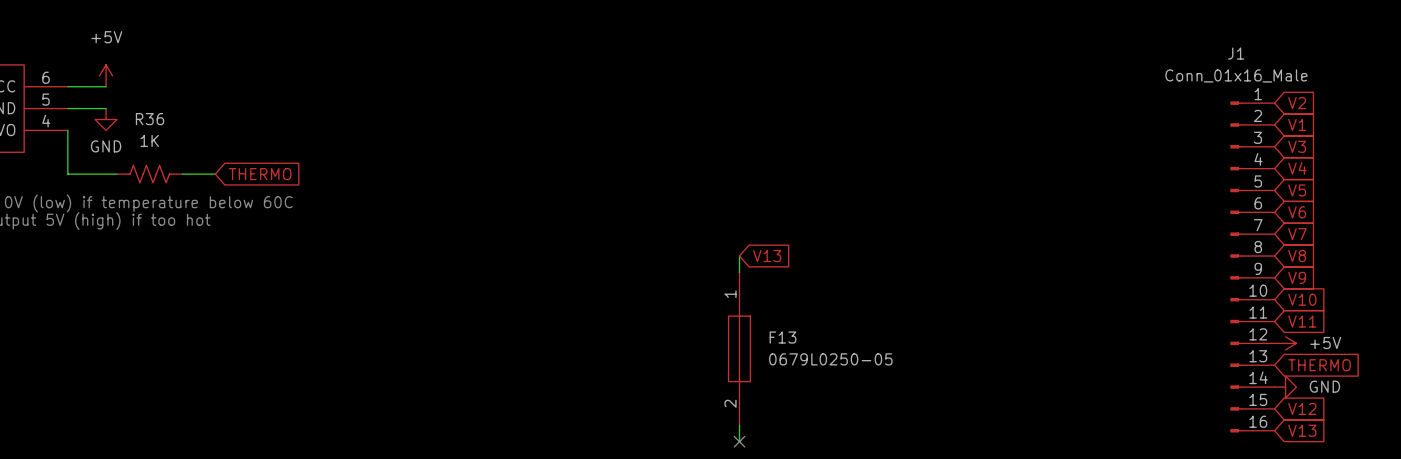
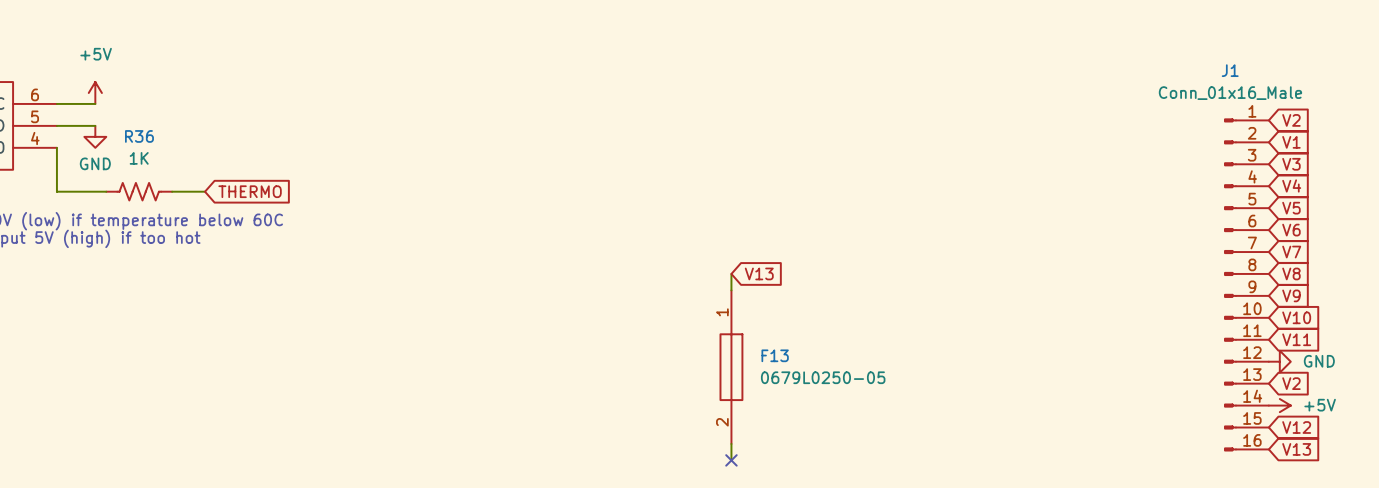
power symbol: +5V (1285, 343) -> GND (1279, 361)
global label: THERMO (1319, 365) -> V2 (1291, 383)
power symbol: GND (1285, 387) -> +5V (1279, 405)

